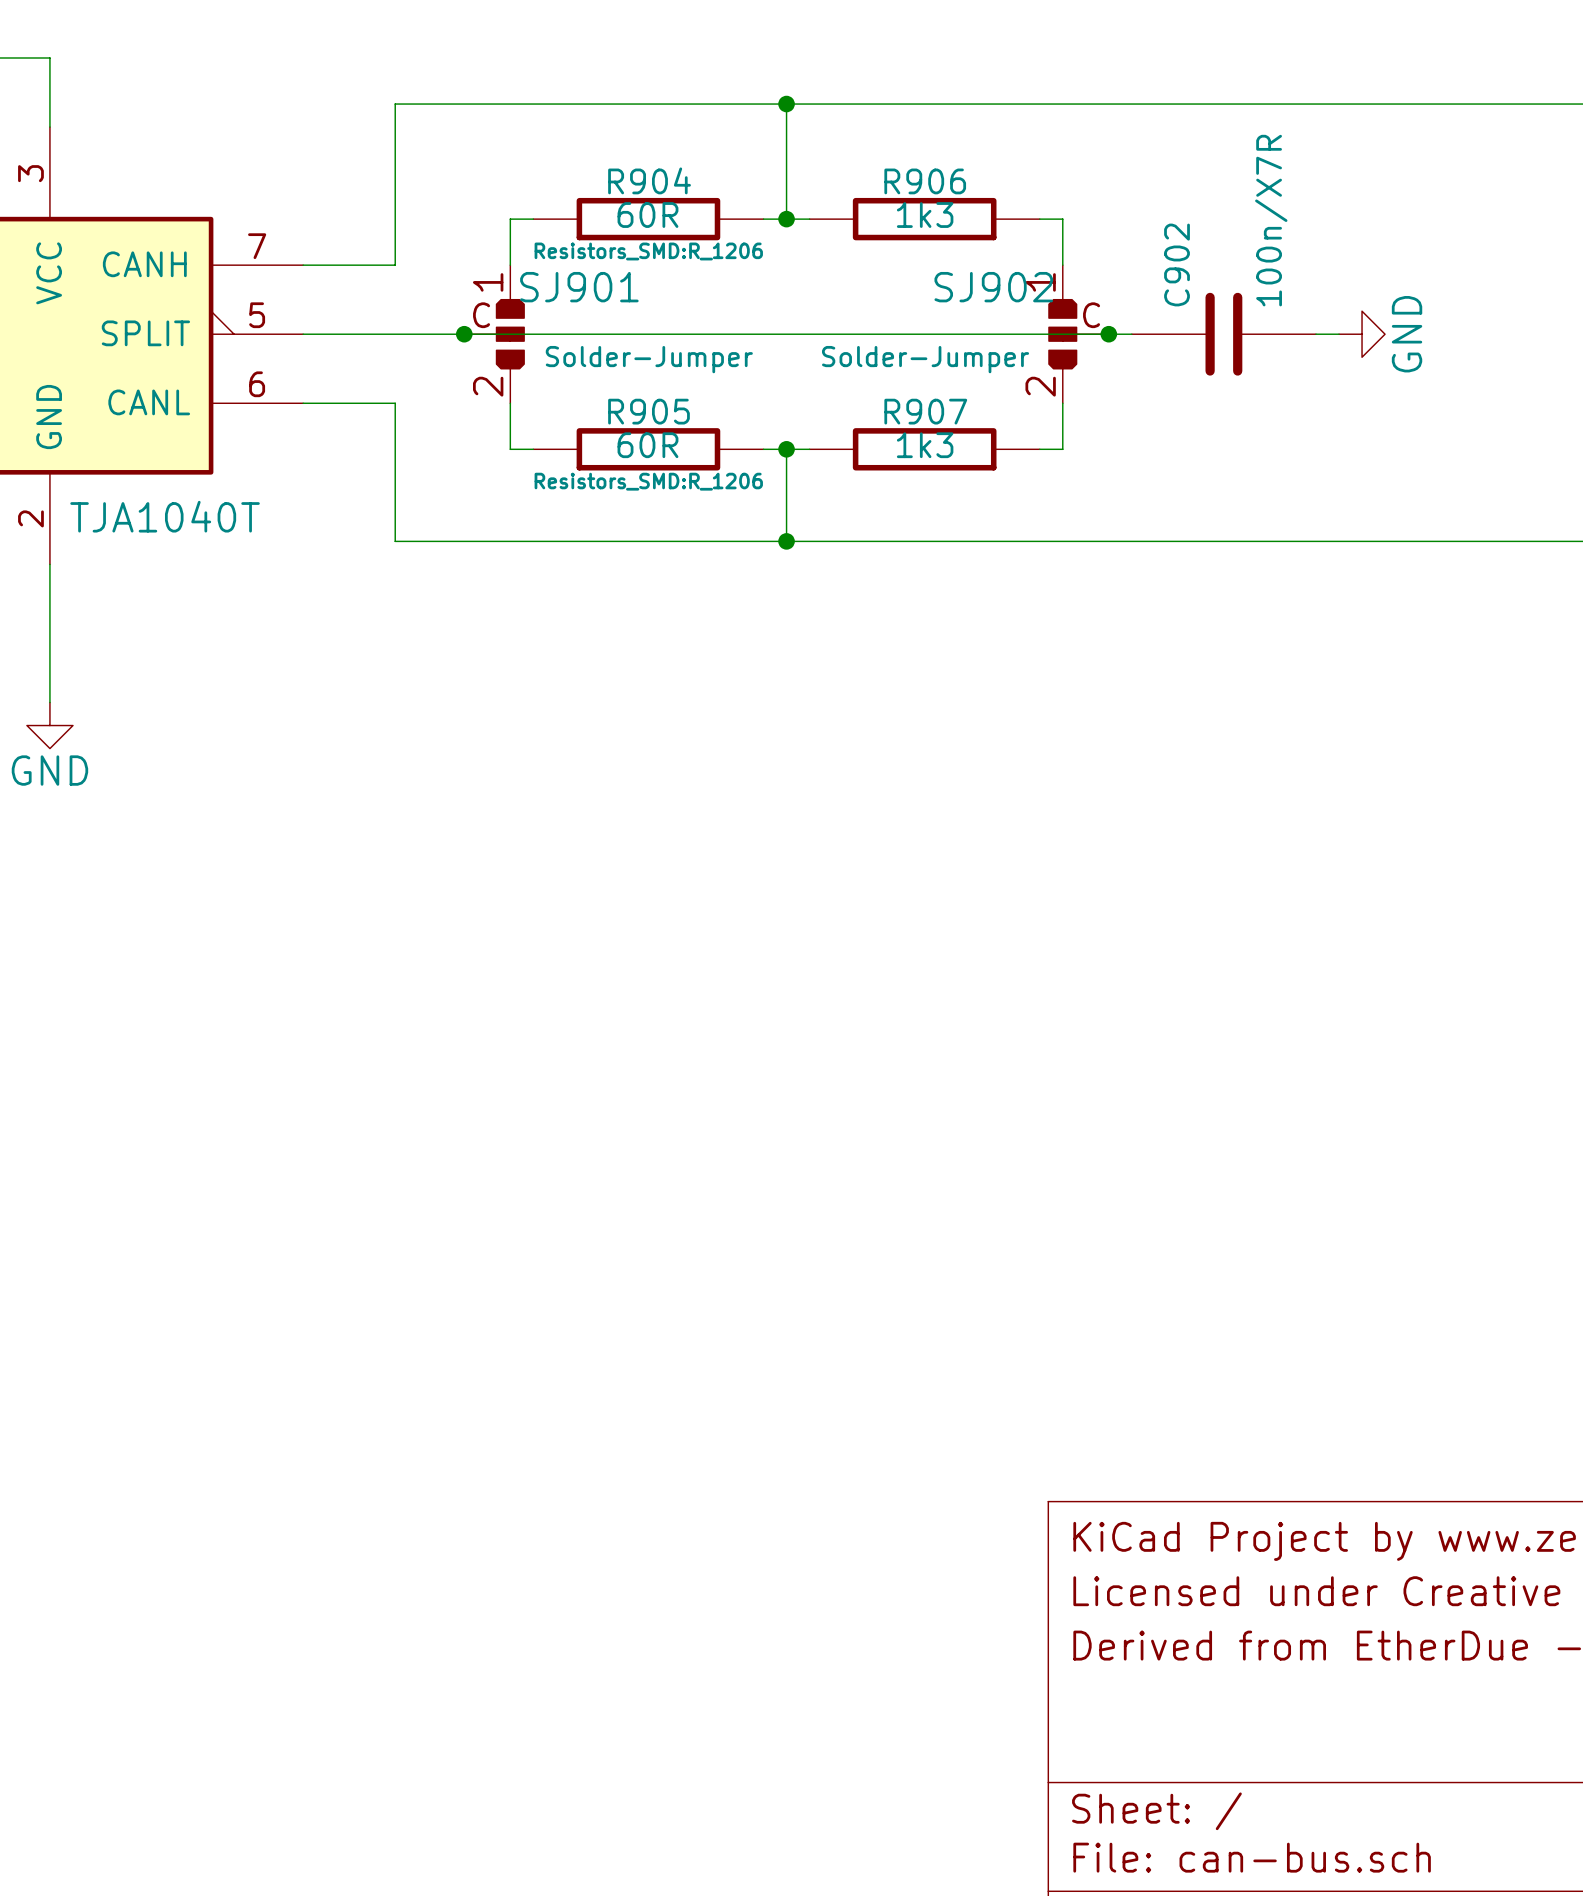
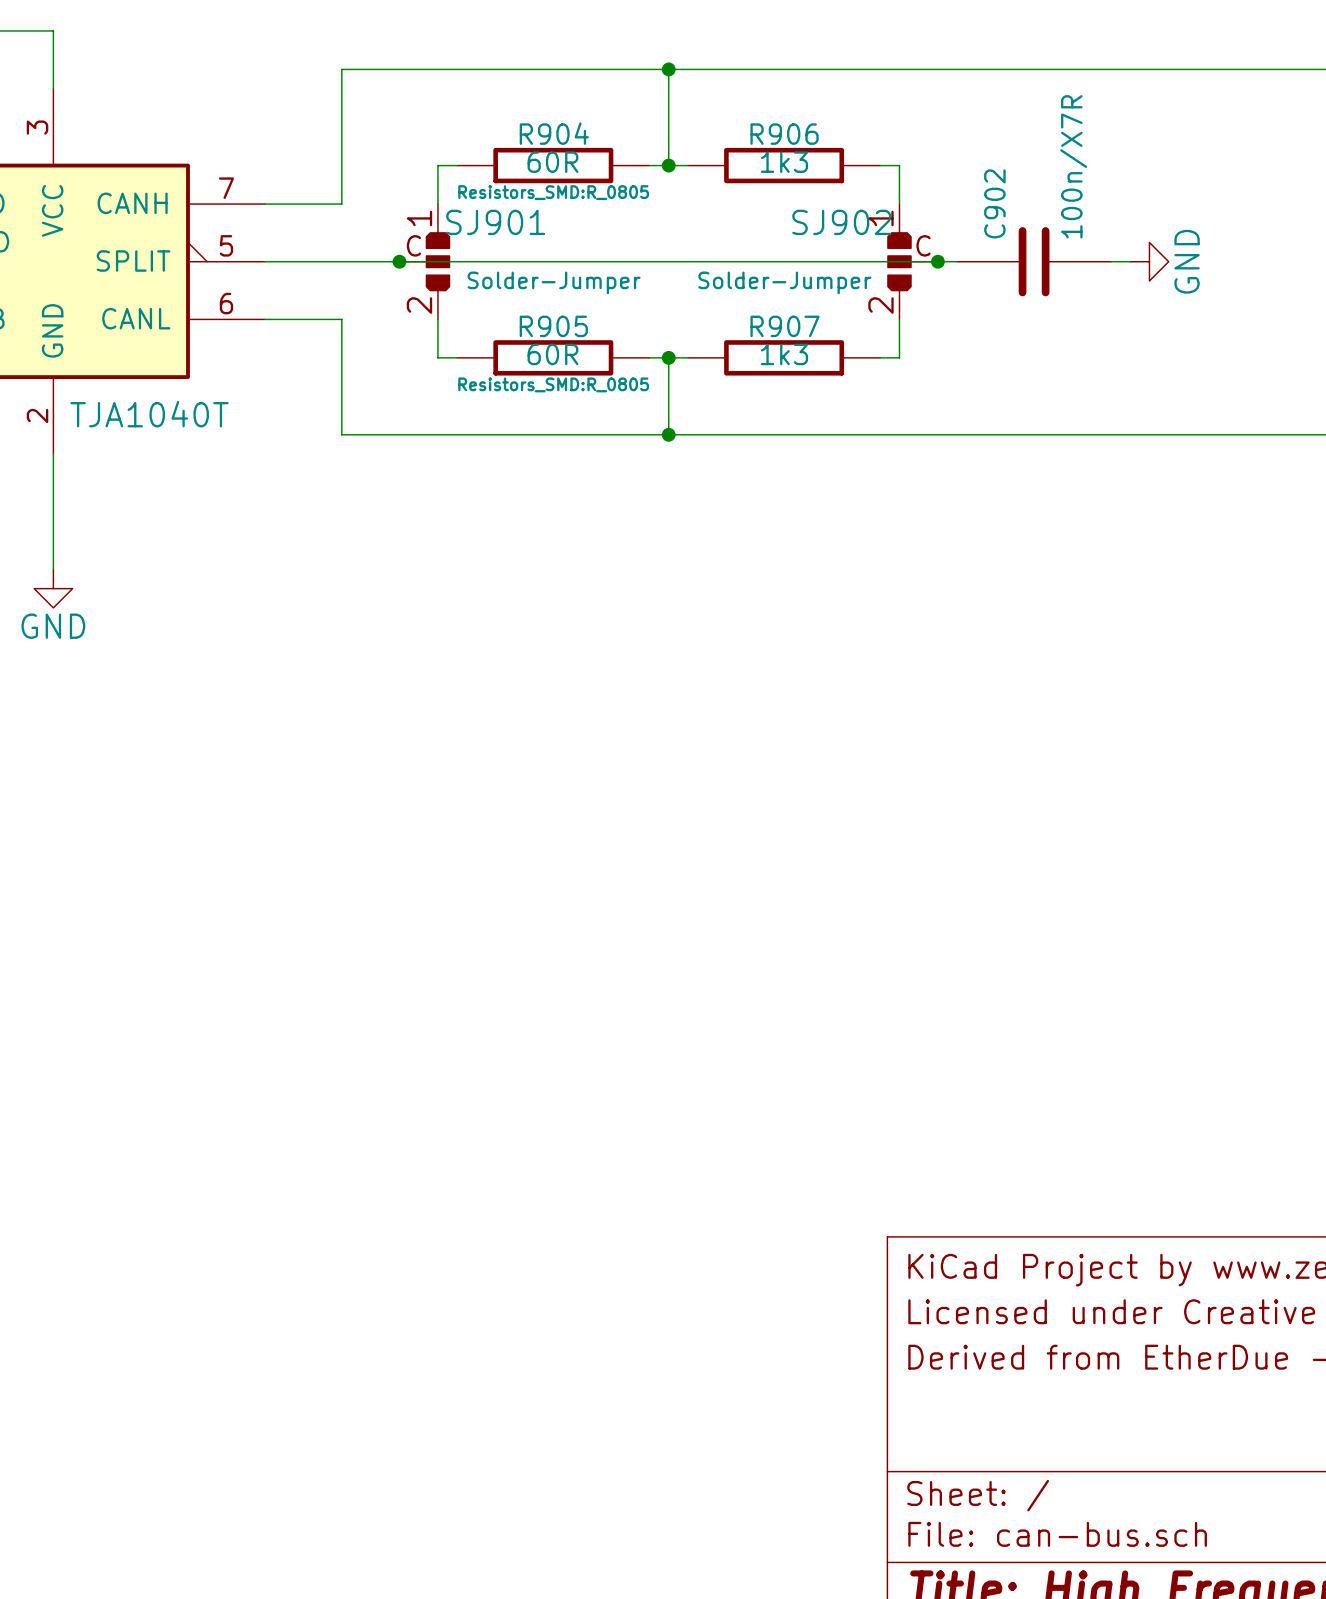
R904 text: Resistors_SMD:R_1206 (648, 251) -> Resistors_SMD:R_0805 (553, 192)
R905 text: Resistors_SMD:R_1206 (648, 481) -> Resistors_SMD:R_0805 (553, 384)

